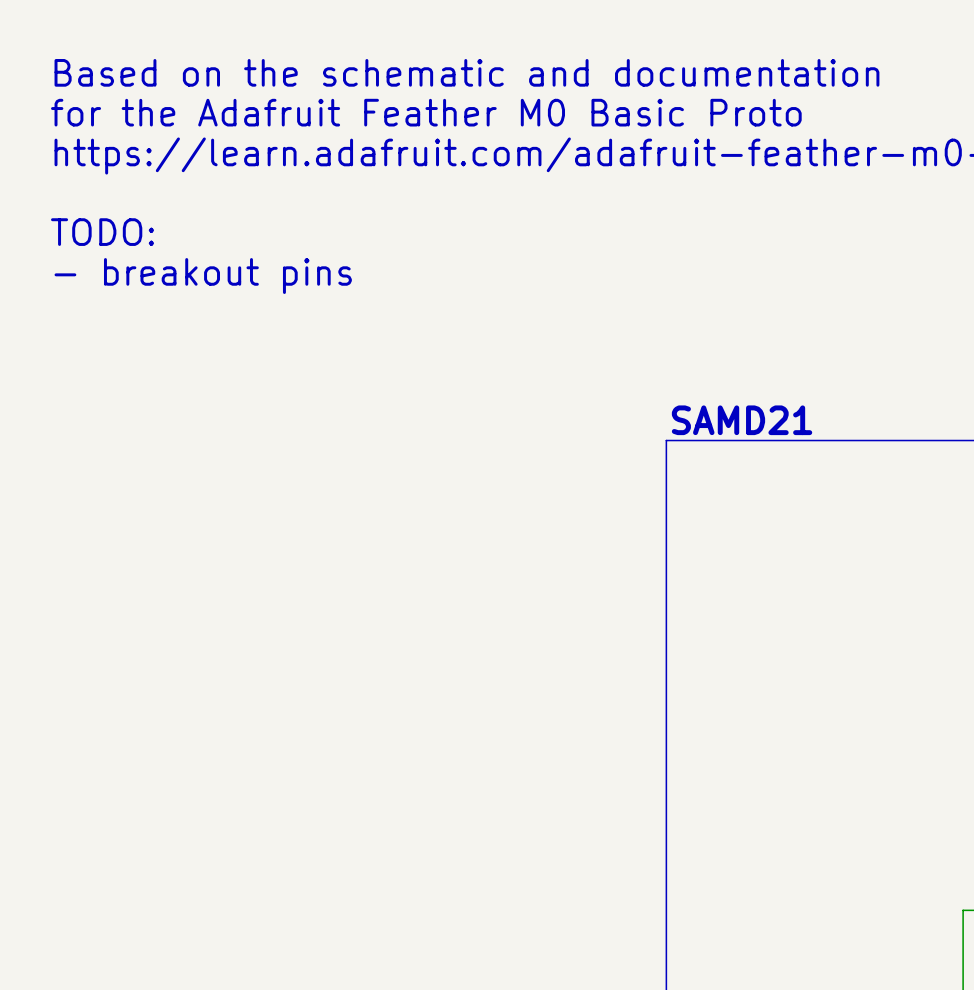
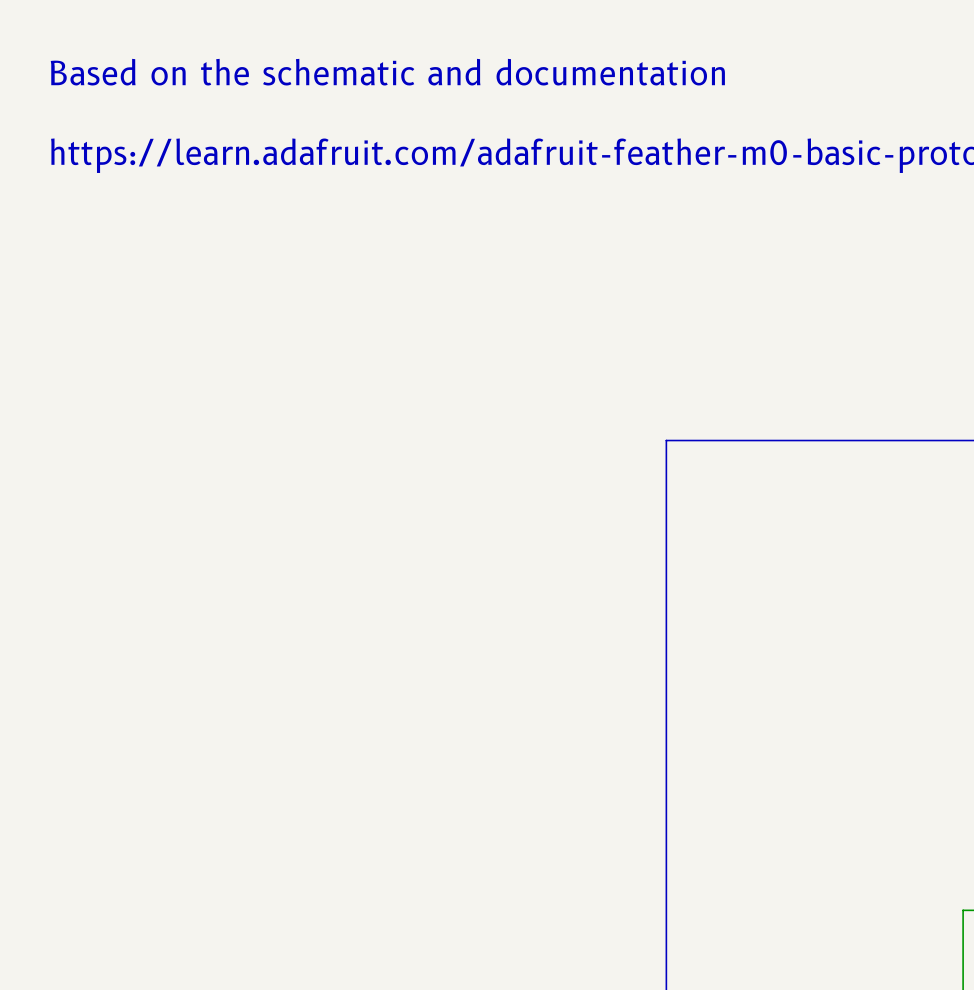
text: for the Adafruit Feather M0 Basic Proto (426, 112) -> none
text: TODO: (102, 232) -> none
text: - breakout pins (203, 276) -> none
text: SAMD21 (742, 420) -> none

